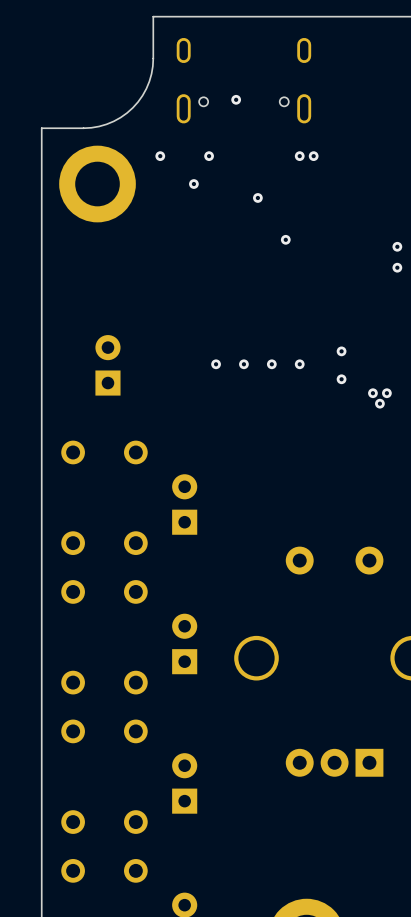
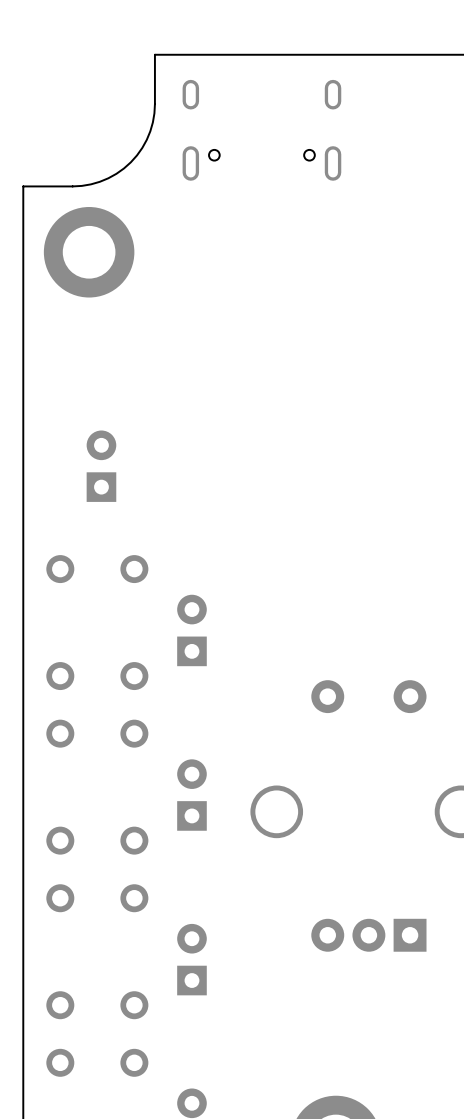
via: (236, 99) -> none
via: (160, 156) -> none
via: (209, 156) -> none
via: (299, 156) -> none
via: (313, 156) -> none
via: (193, 184) -> none
via: (257, 197) -> none
via: (285, 239) -> none
via: (397, 246) -> none
via: (397, 267) -> none
via: (341, 351) -> none
via: (216, 364) -> none
via: (243, 364) -> none
via: (271, 364) -> none
via: (299, 364) -> none
via: (341, 379) -> none
via: (372, 393) -> none
via: (386, 393) -> none
via: (379, 403) -> none

